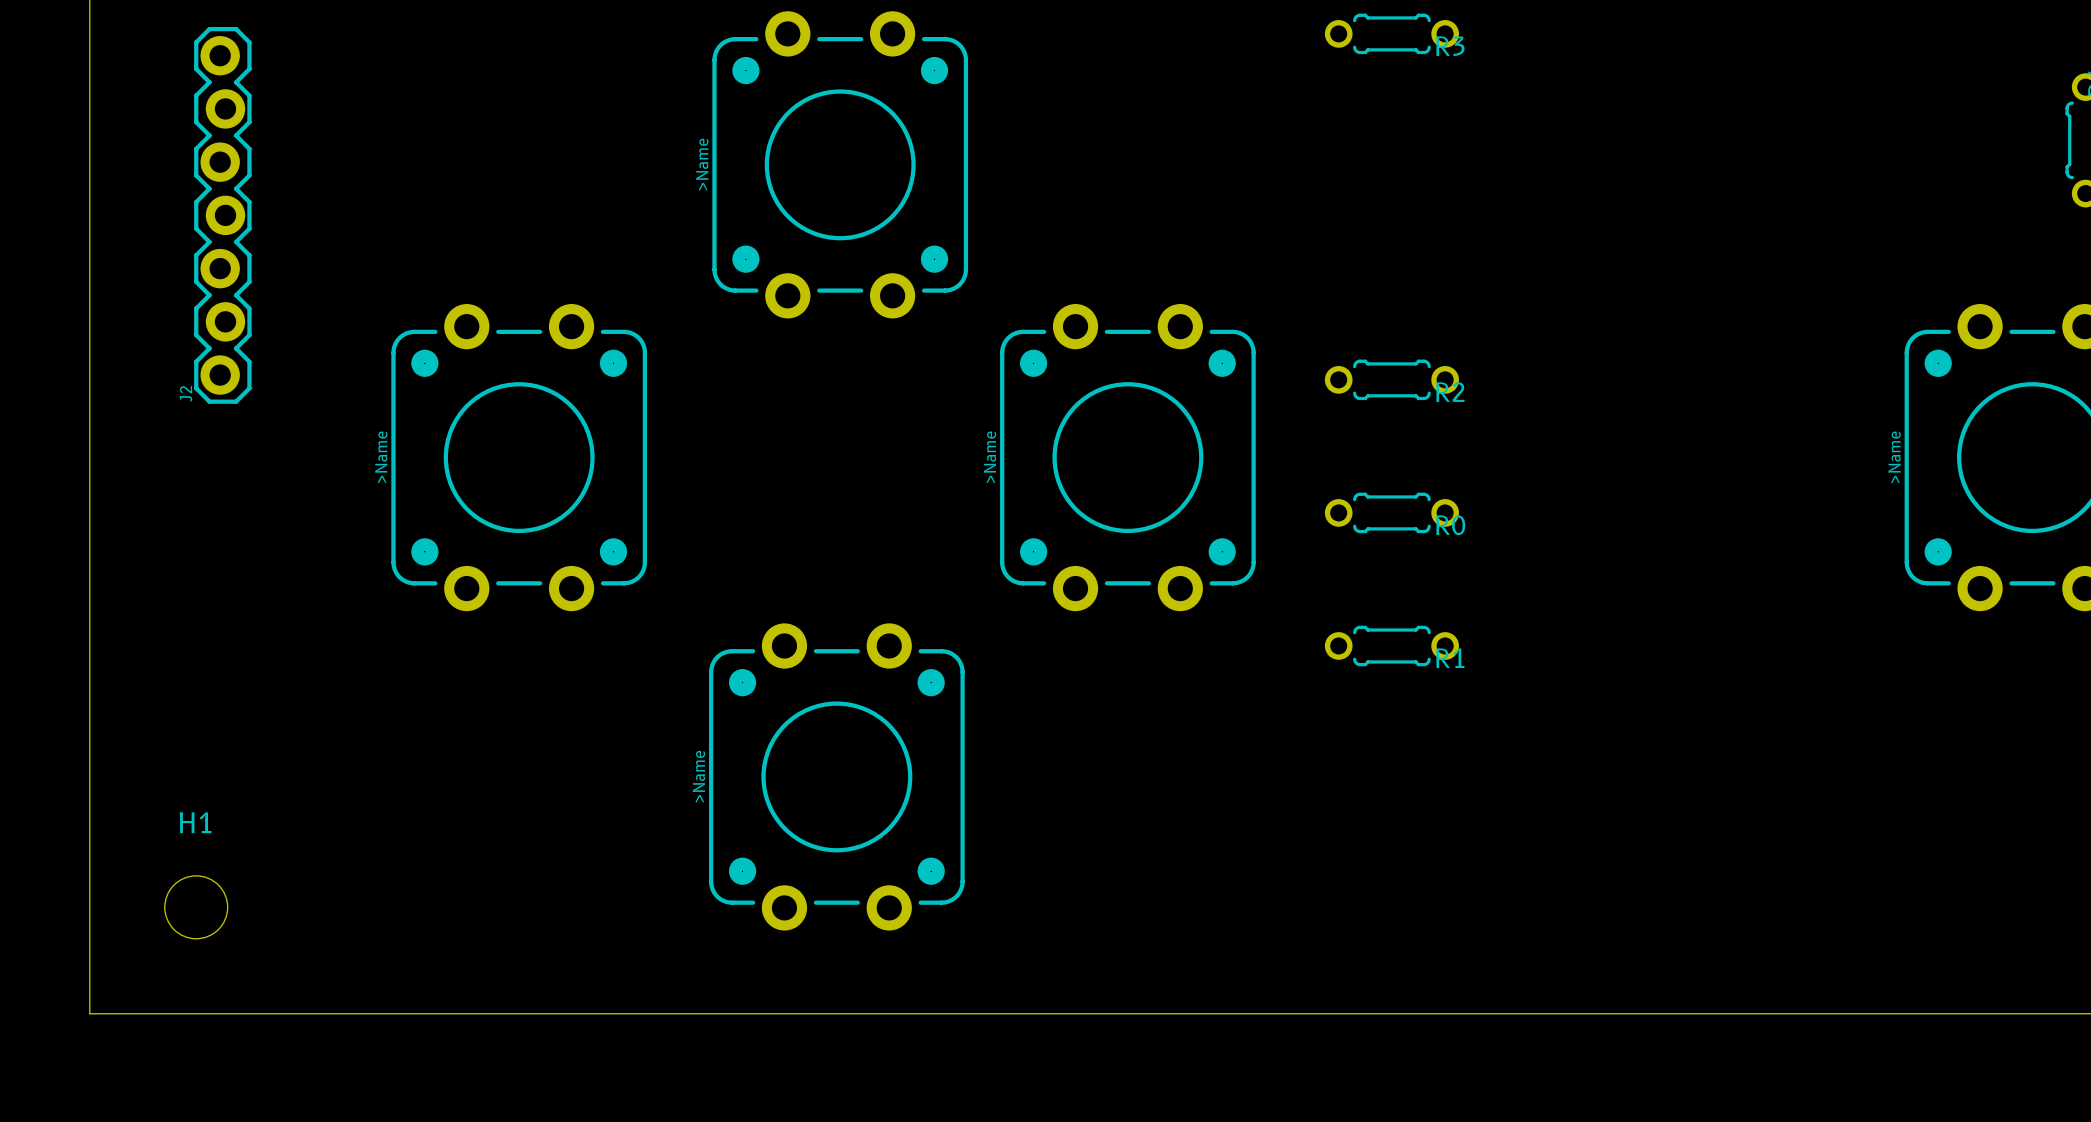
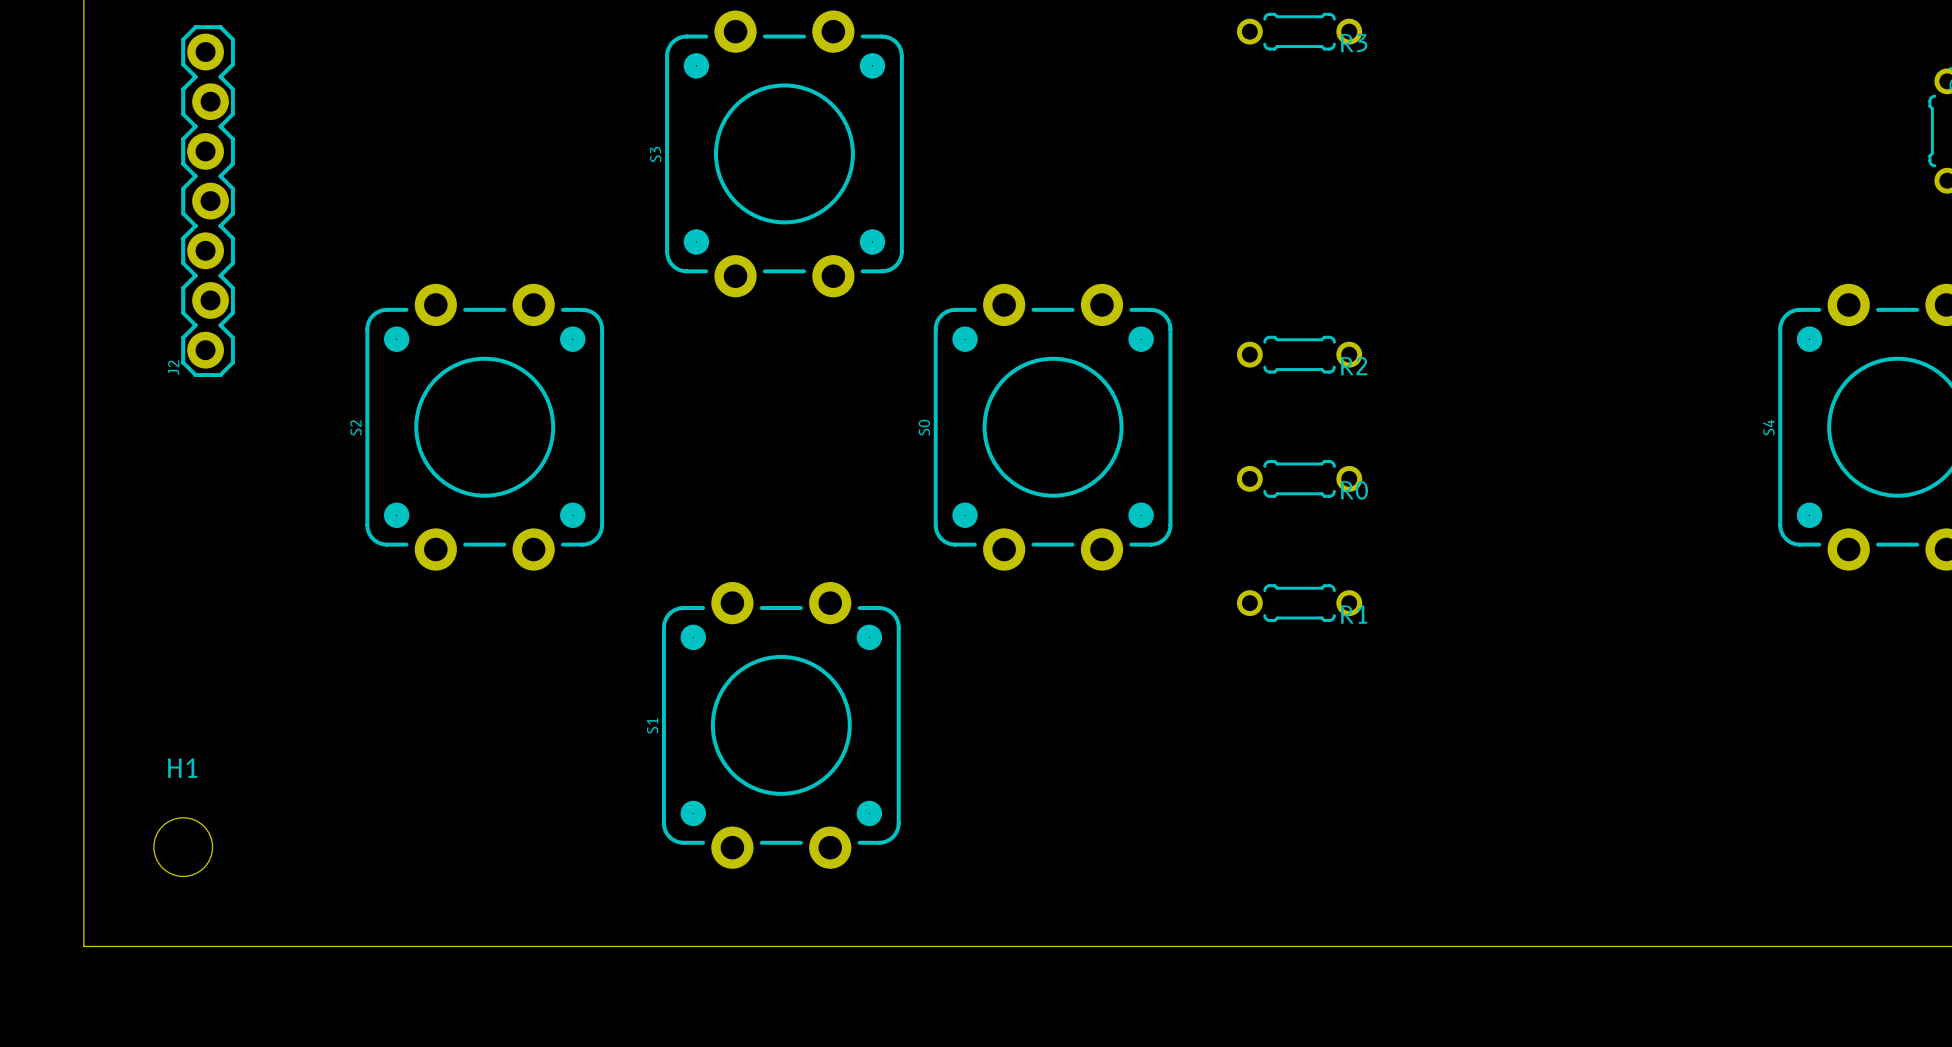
part text: >Name (702, 164) -> S3 (655, 154)
part text: >Name (381, 457) -> S2 (356, 427)
part text: >Name (990, 457) -> S0 (924, 427)
part text: >Name (1894, 457) -> S4 (1768, 427)
part text: >Name (698, 776) -> S1 (652, 726)

